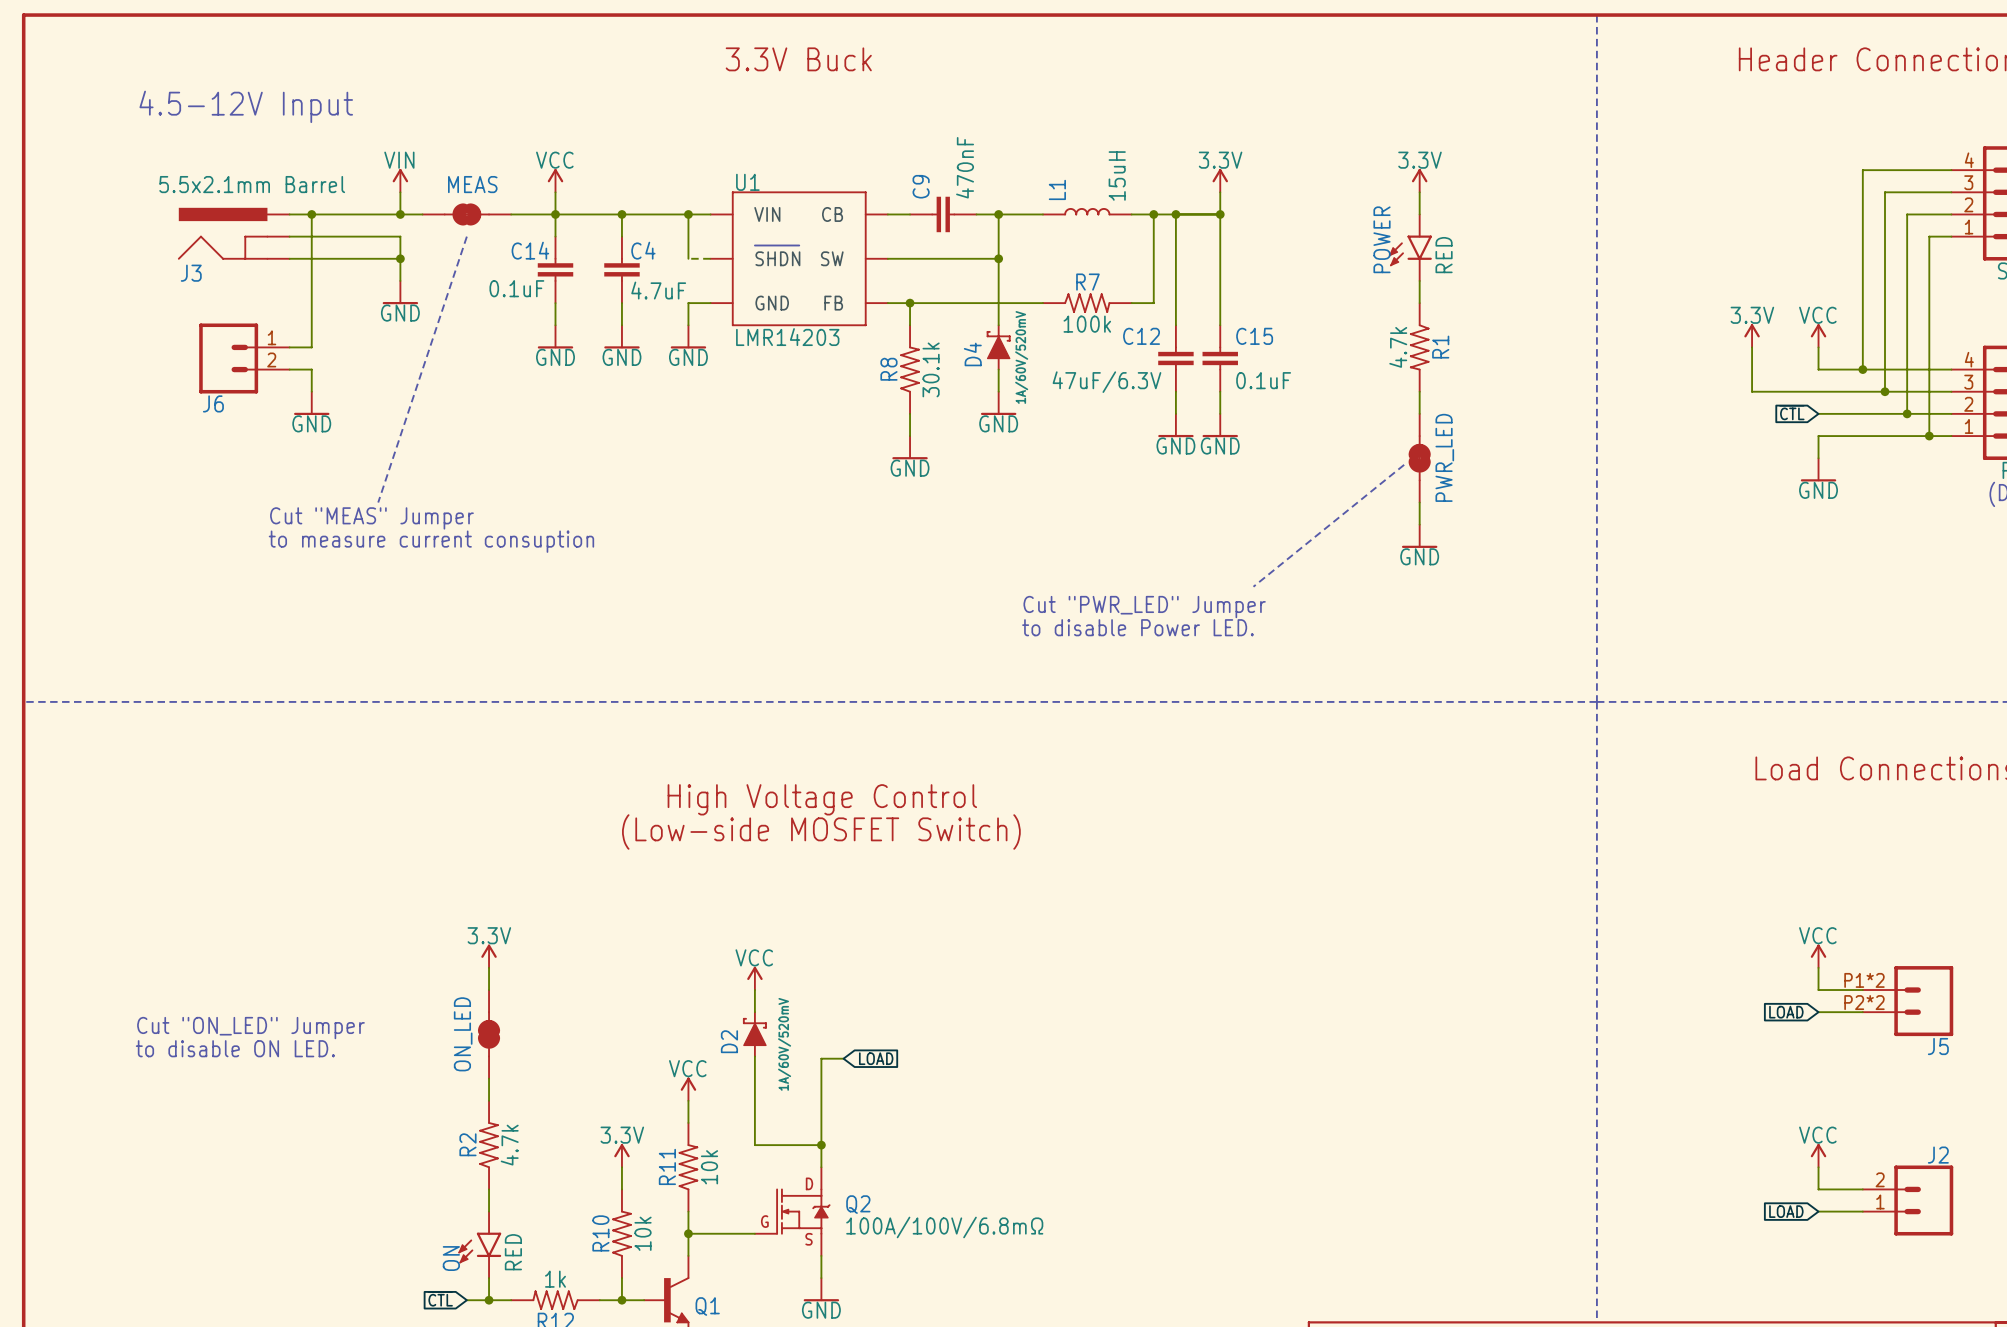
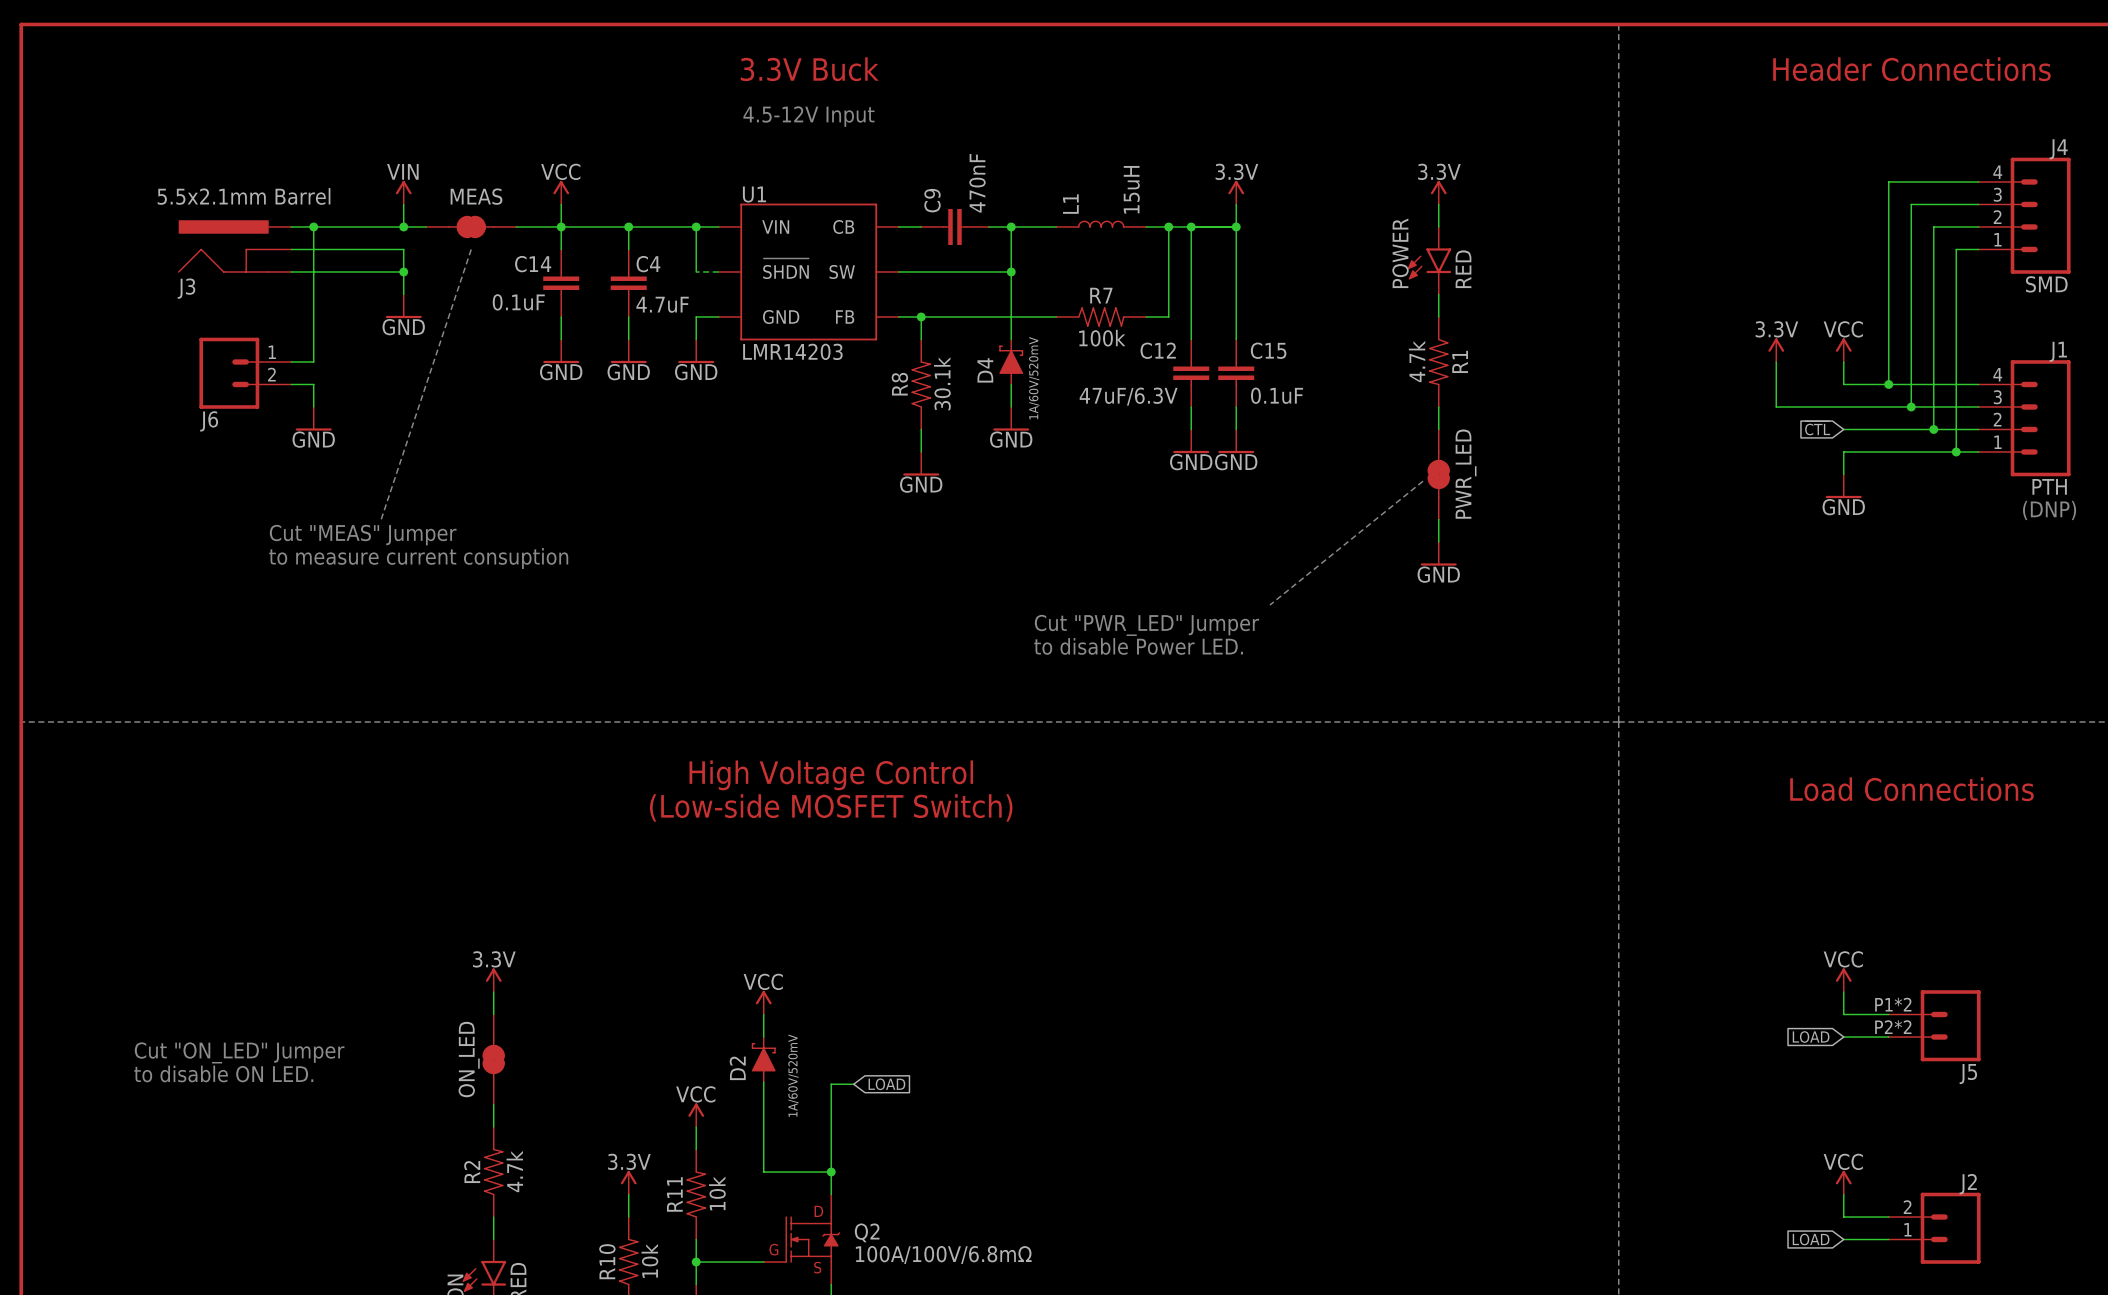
text: none -> 4.5-12V Input (808, 116)
text: 4.5-12V Input (246, 106) -> none
text position: High Voltage Control (822, 799) -> High Voltage Control (831, 775)
text position: (Low-side MOSFET Switch) (821, 832) -> (Low-side MOSFET Switch) (831, 807)

